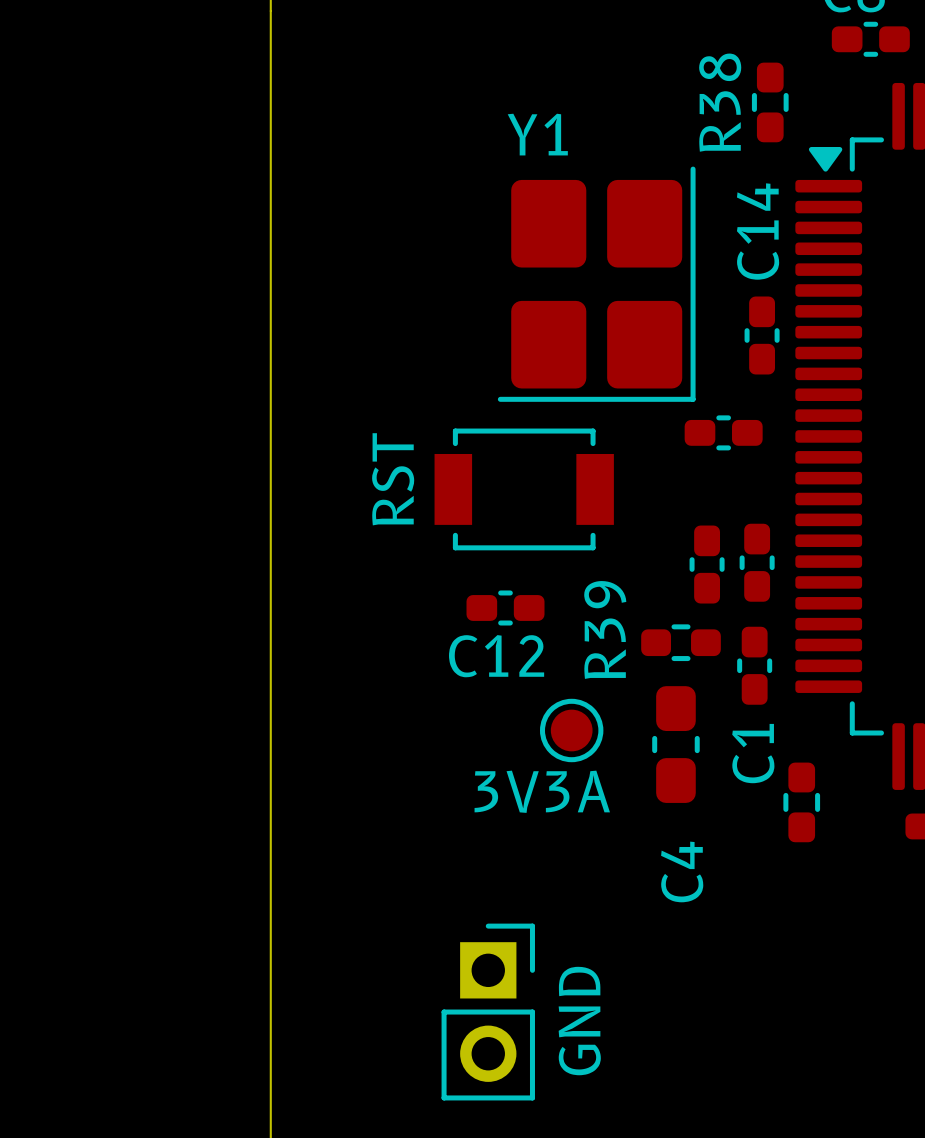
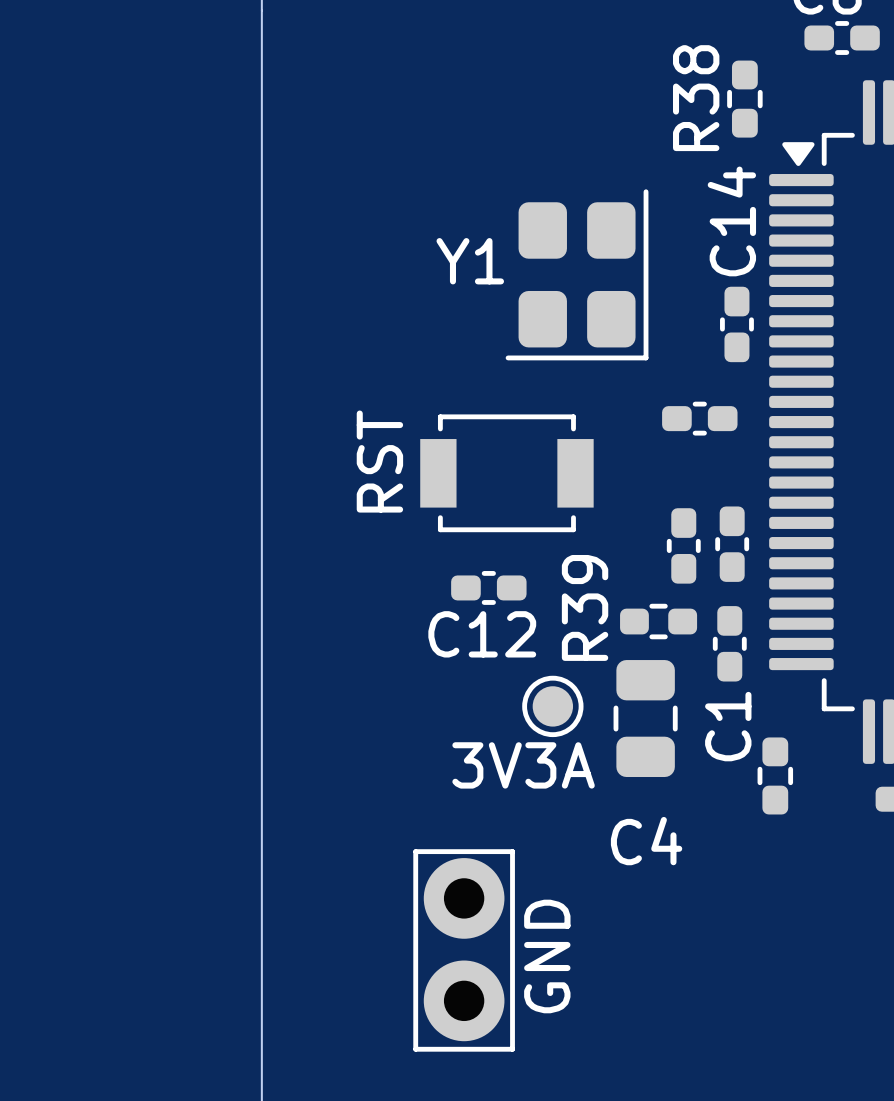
Y1 name position: Y1 (537, 134) -> Y1 (470, 261)
Y1 footprint: [497, 166, 696, 402] -> [505, 189, 649, 361]
C4 footprint: [652, 686, 700, 803] -> [613, 660, 678, 778]
C4 name rotation: 0° (682, 871) -> 90° clockwise (646, 841)
GND footprint: [441, 923, 535, 1101] -> [413, 849, 515, 1052]

